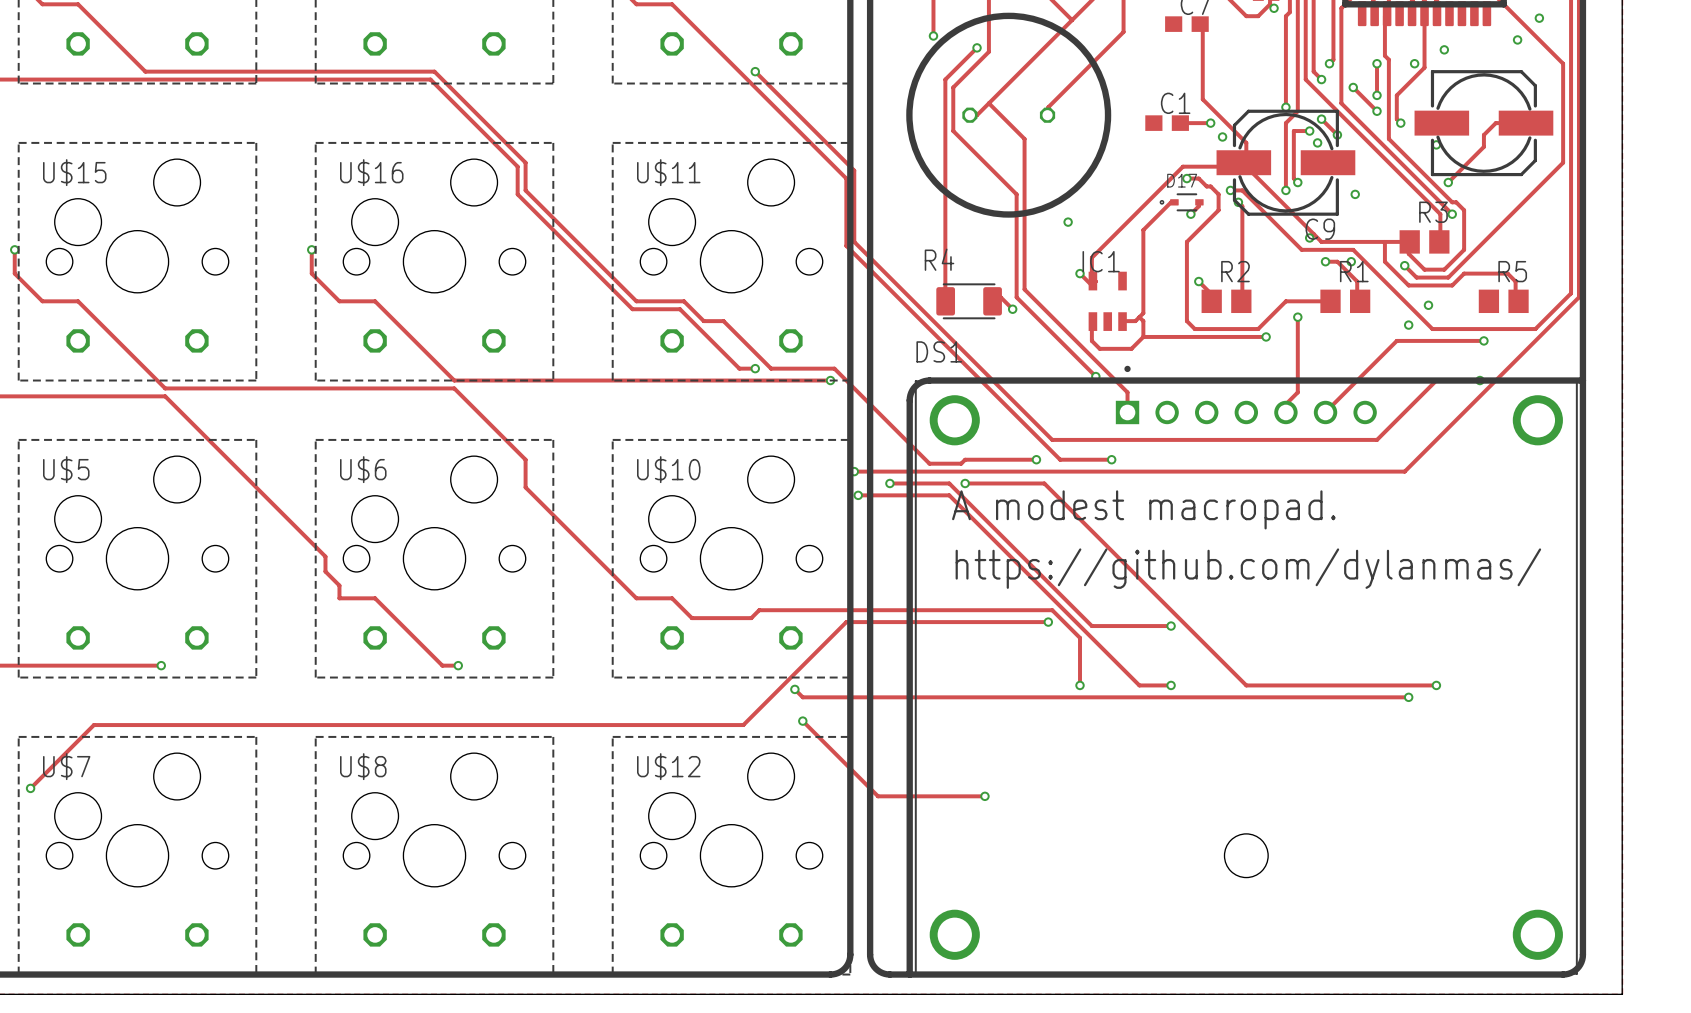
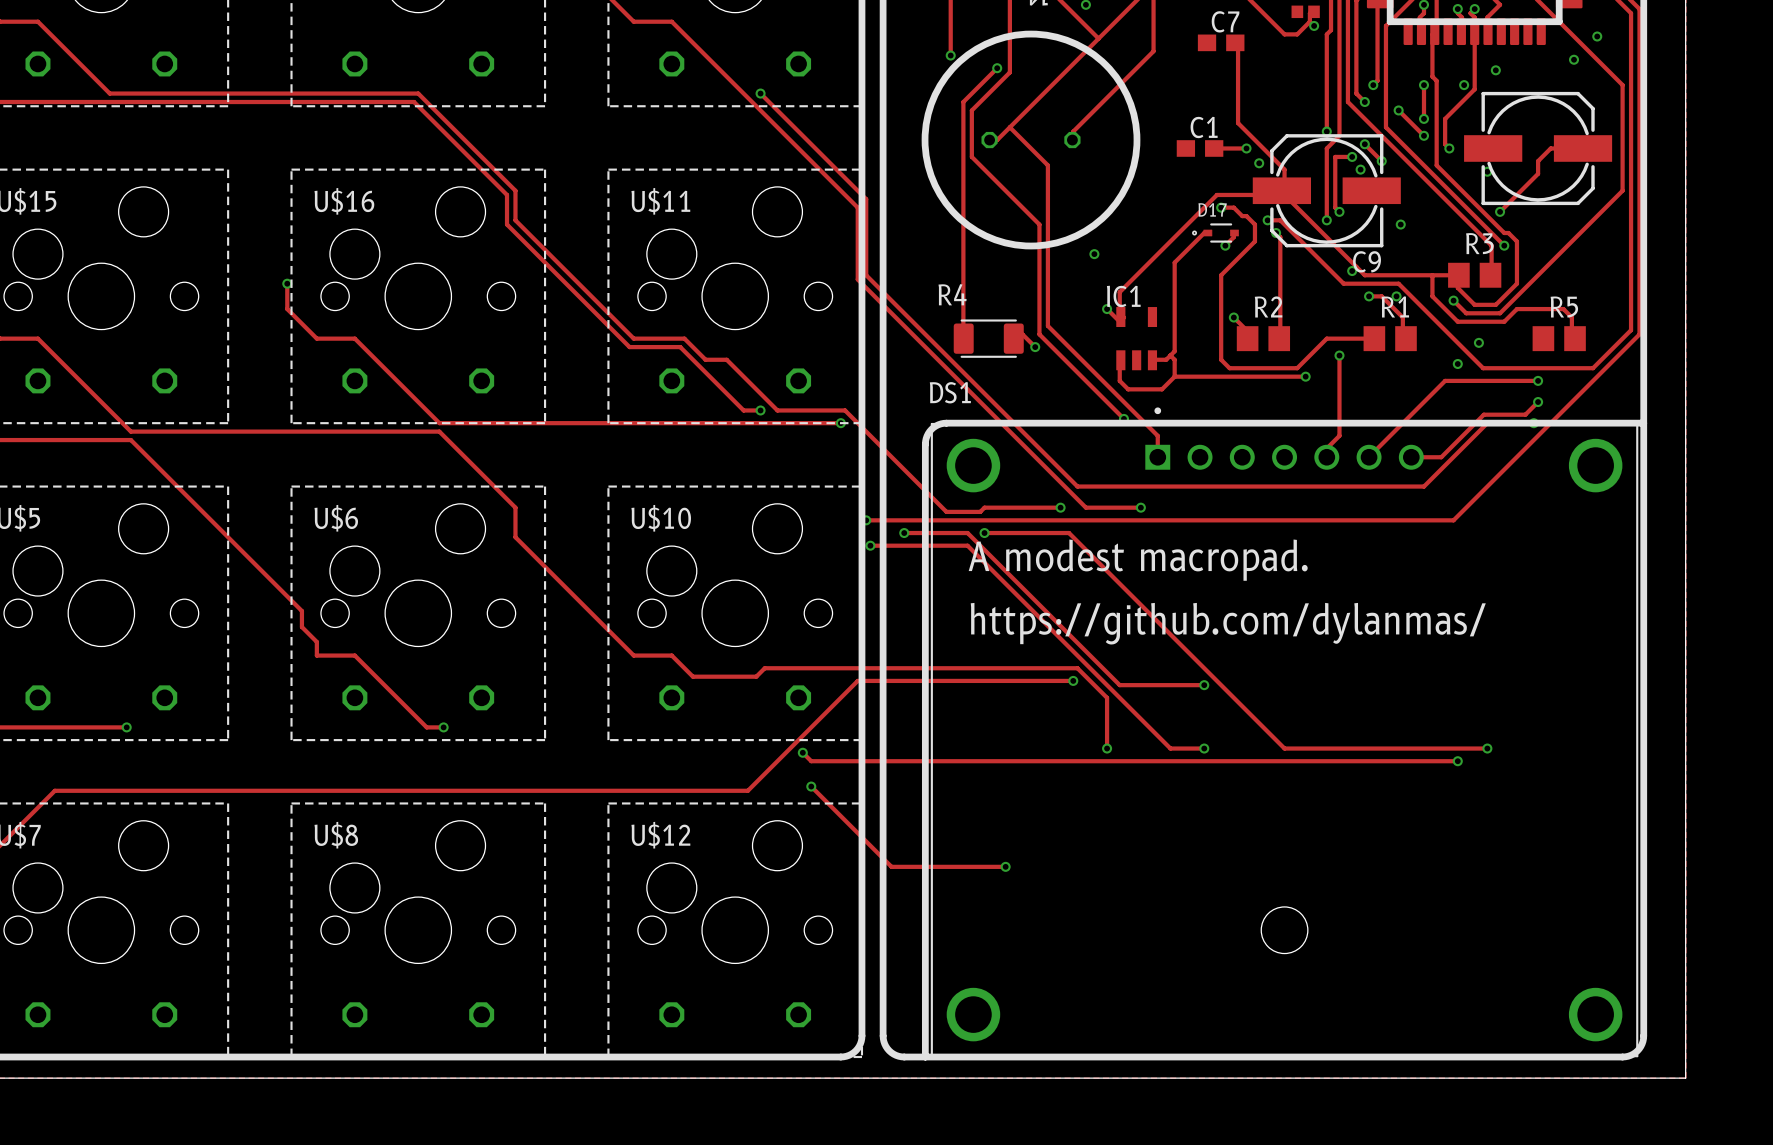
track: none -> (1538, 402) (1525, 414) (1483, 414) (1441, 457) (1411, 457)
via: none -> (1538, 402)

